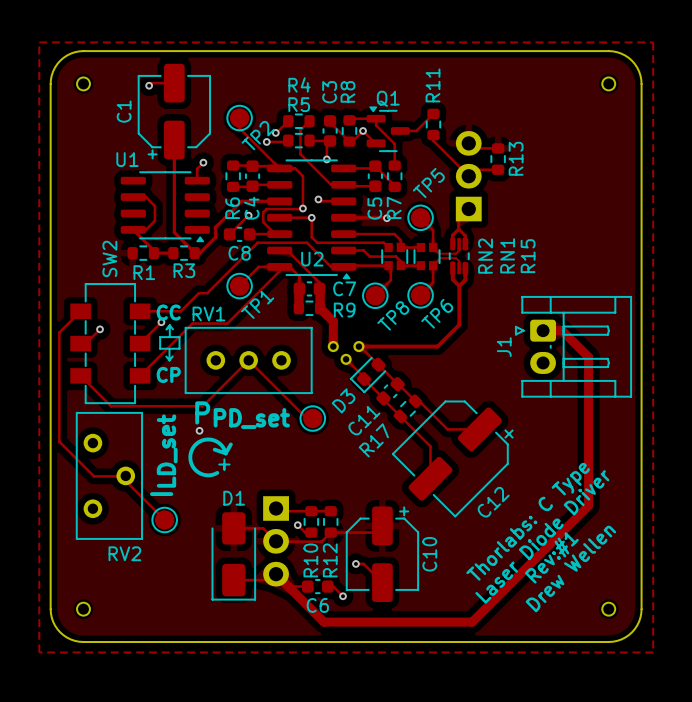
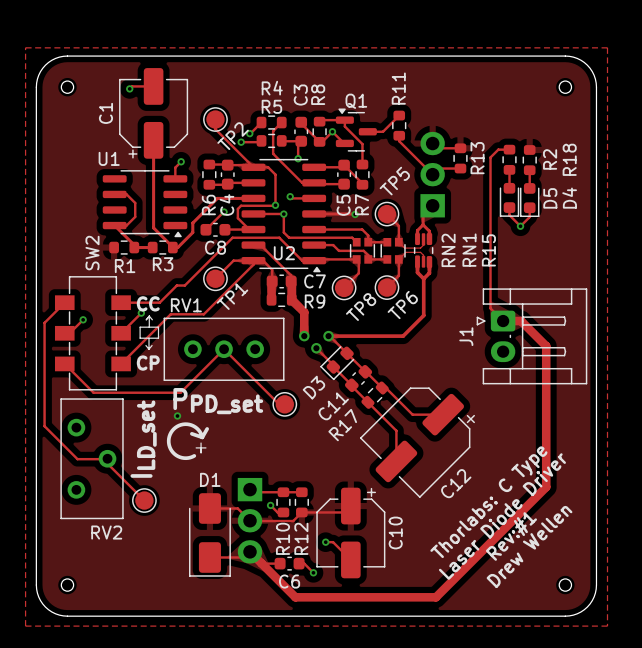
track: none -> (509, 149) (498, 149) (490, 157) (490, 308) (503, 321)
R2: none -> (509, 159)
R18: none -> (529, 160)
track: none -> (509, 169) (509, 188)
track: none -> (529, 170) (529, 188)
D5: none -> (509, 199)
D4: none -> (529, 200)
track: none -> (509, 207) (509, 215) (520, 226) (529, 217) (529, 207)
via: none -> (520, 226)

